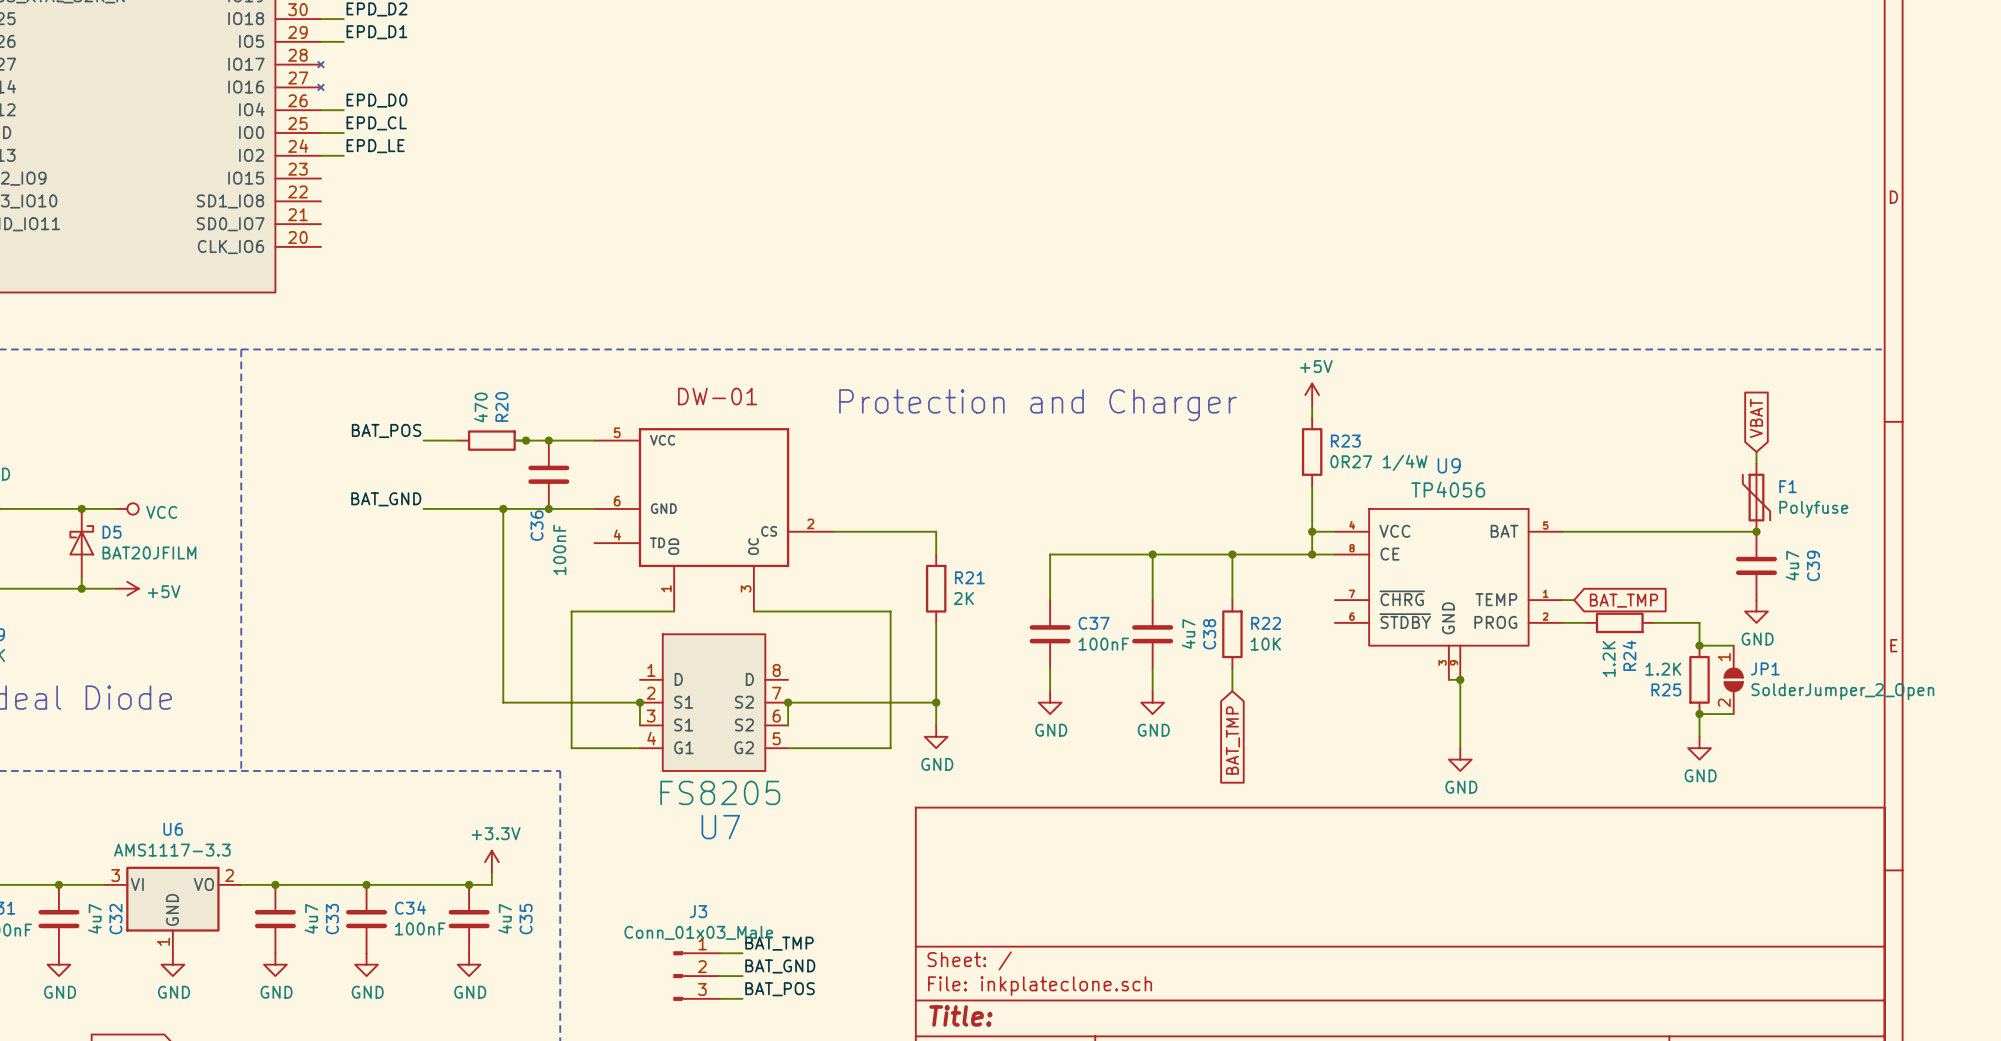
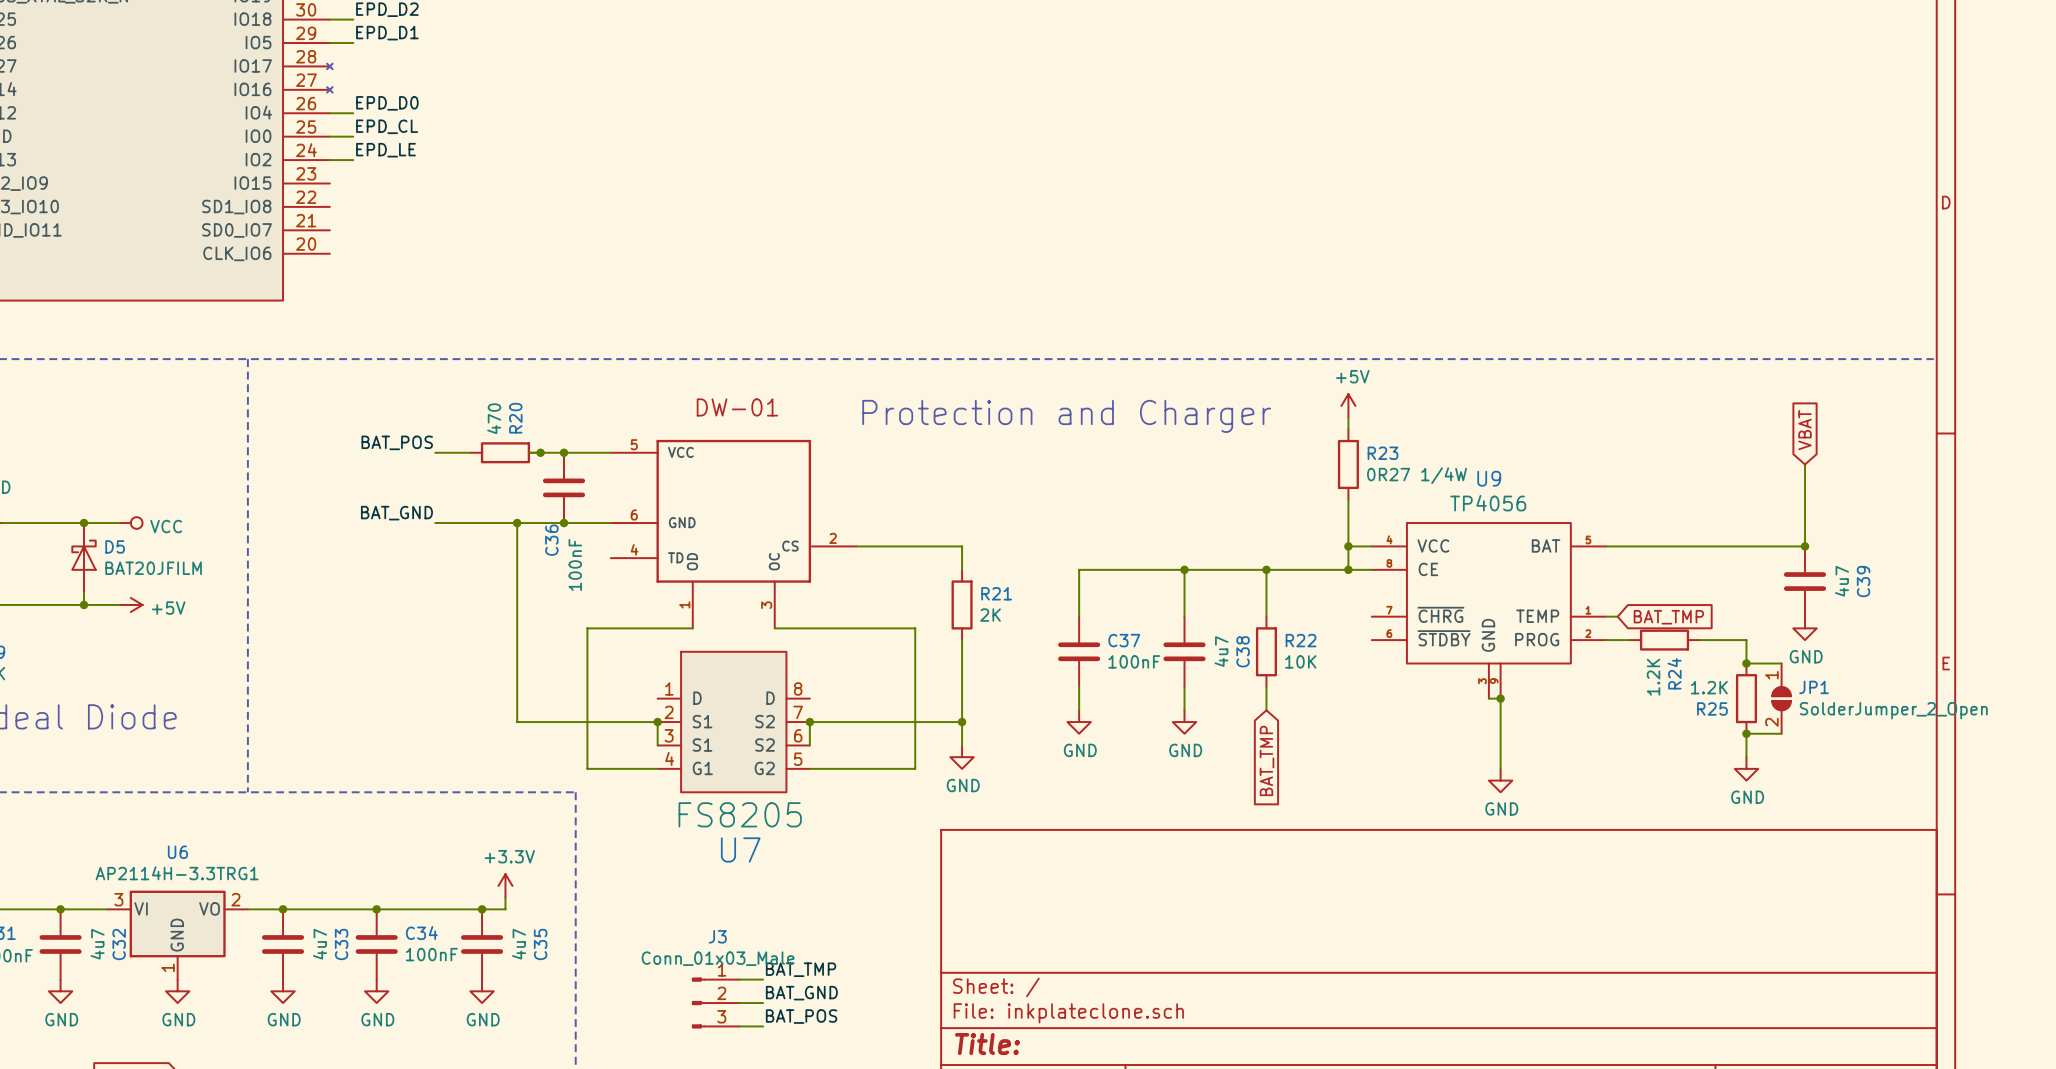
F1: Polyfuse (1756, 497) -> none
U6 value: AMS1117-3.3 (172, 850) -> AP2114H-3.3TRG1 (177, 873)

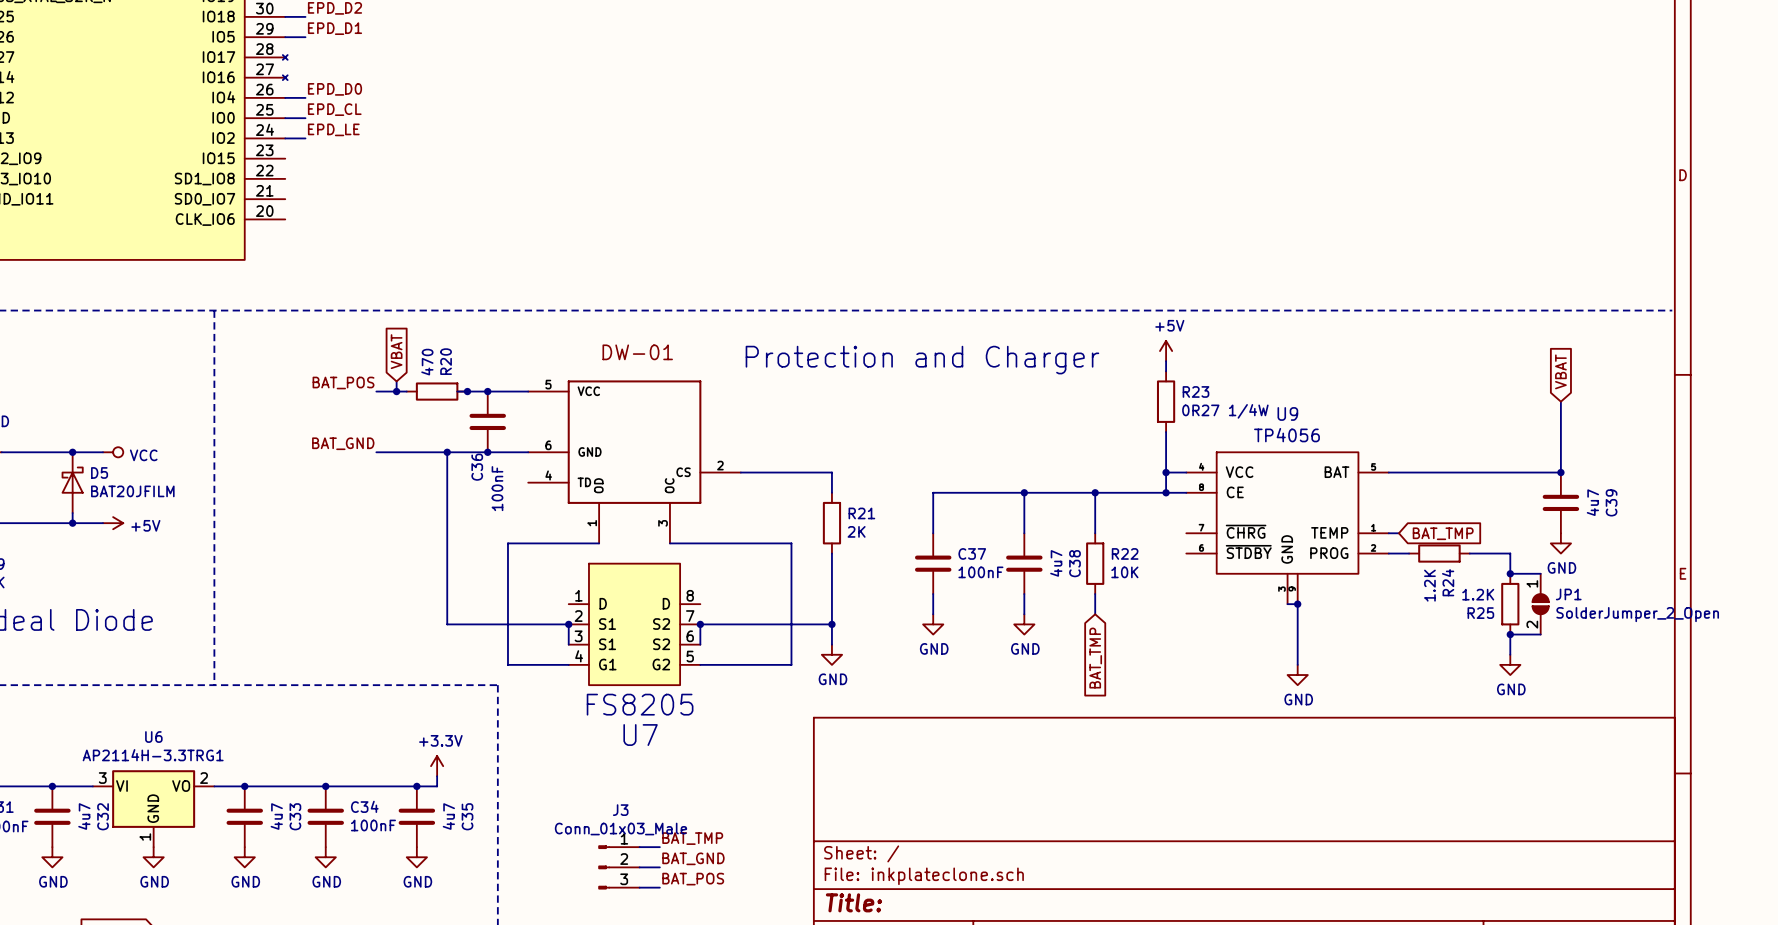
global label: none -> VBAT (396, 351)
wire: none -> (396, 381) (396, 391)
junction: none -> (396, 391)

